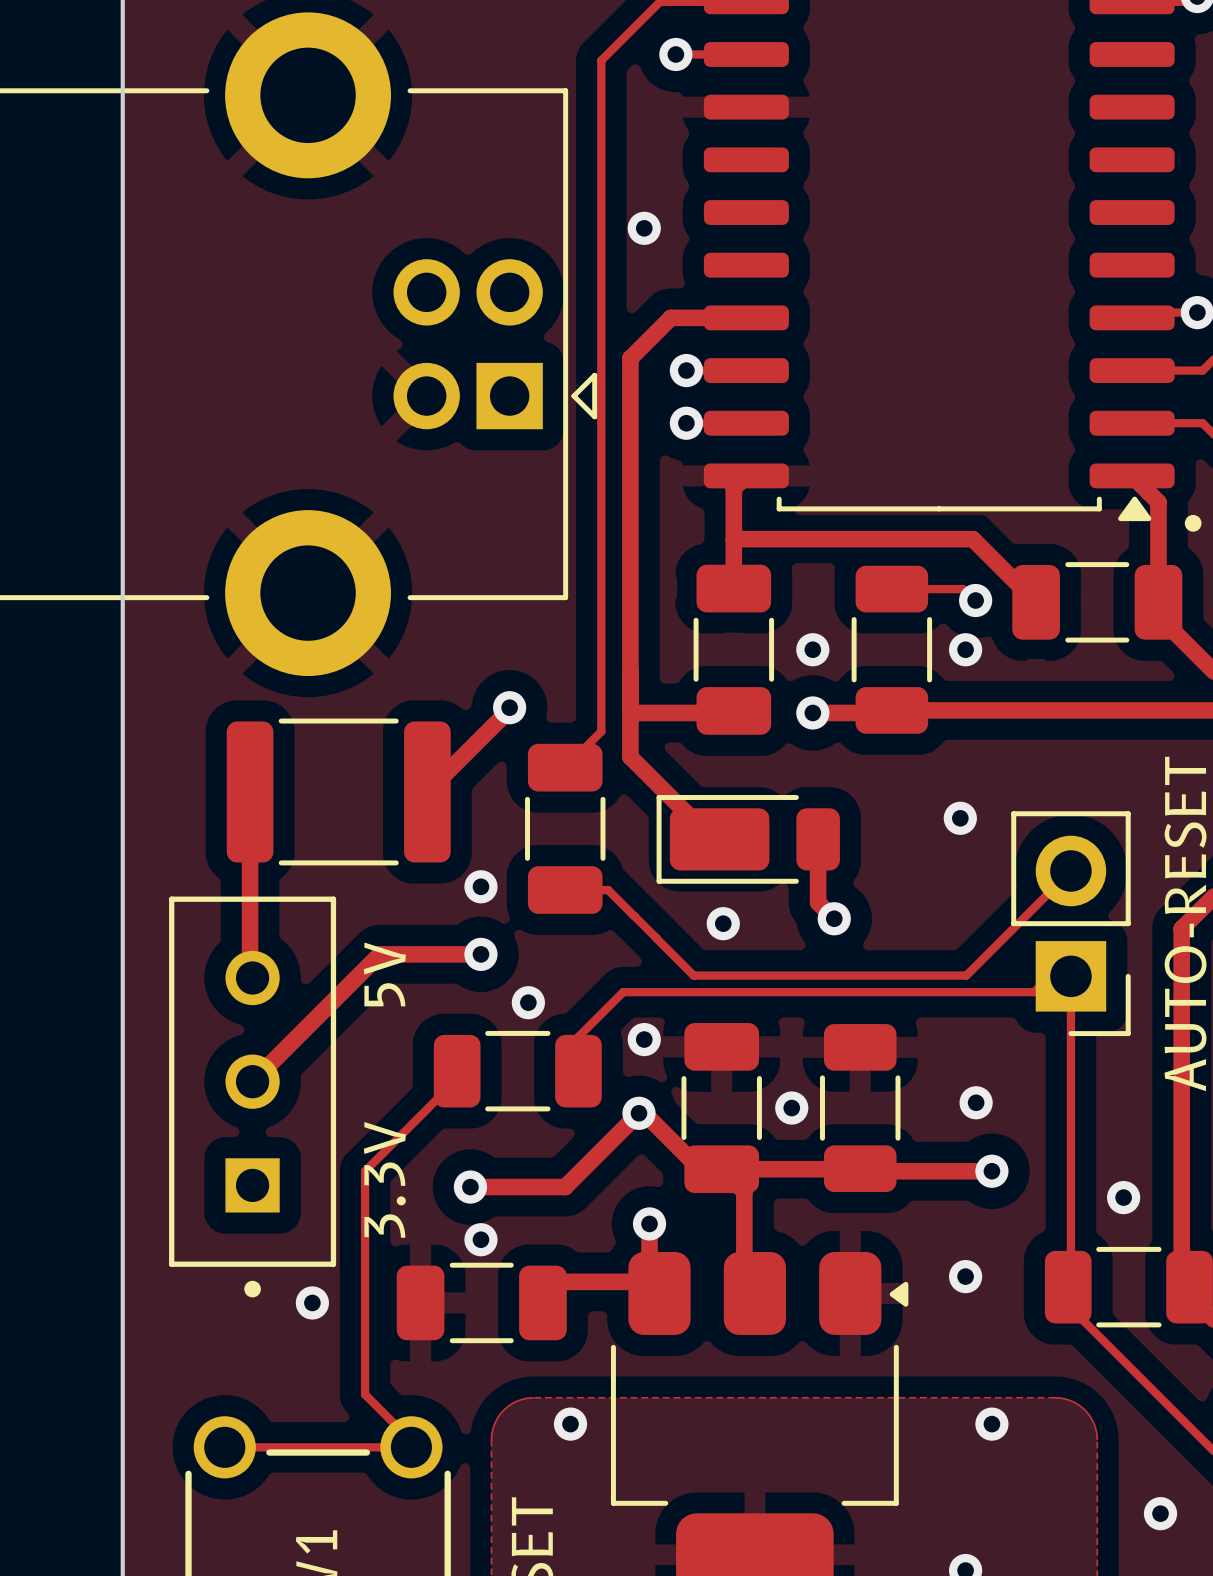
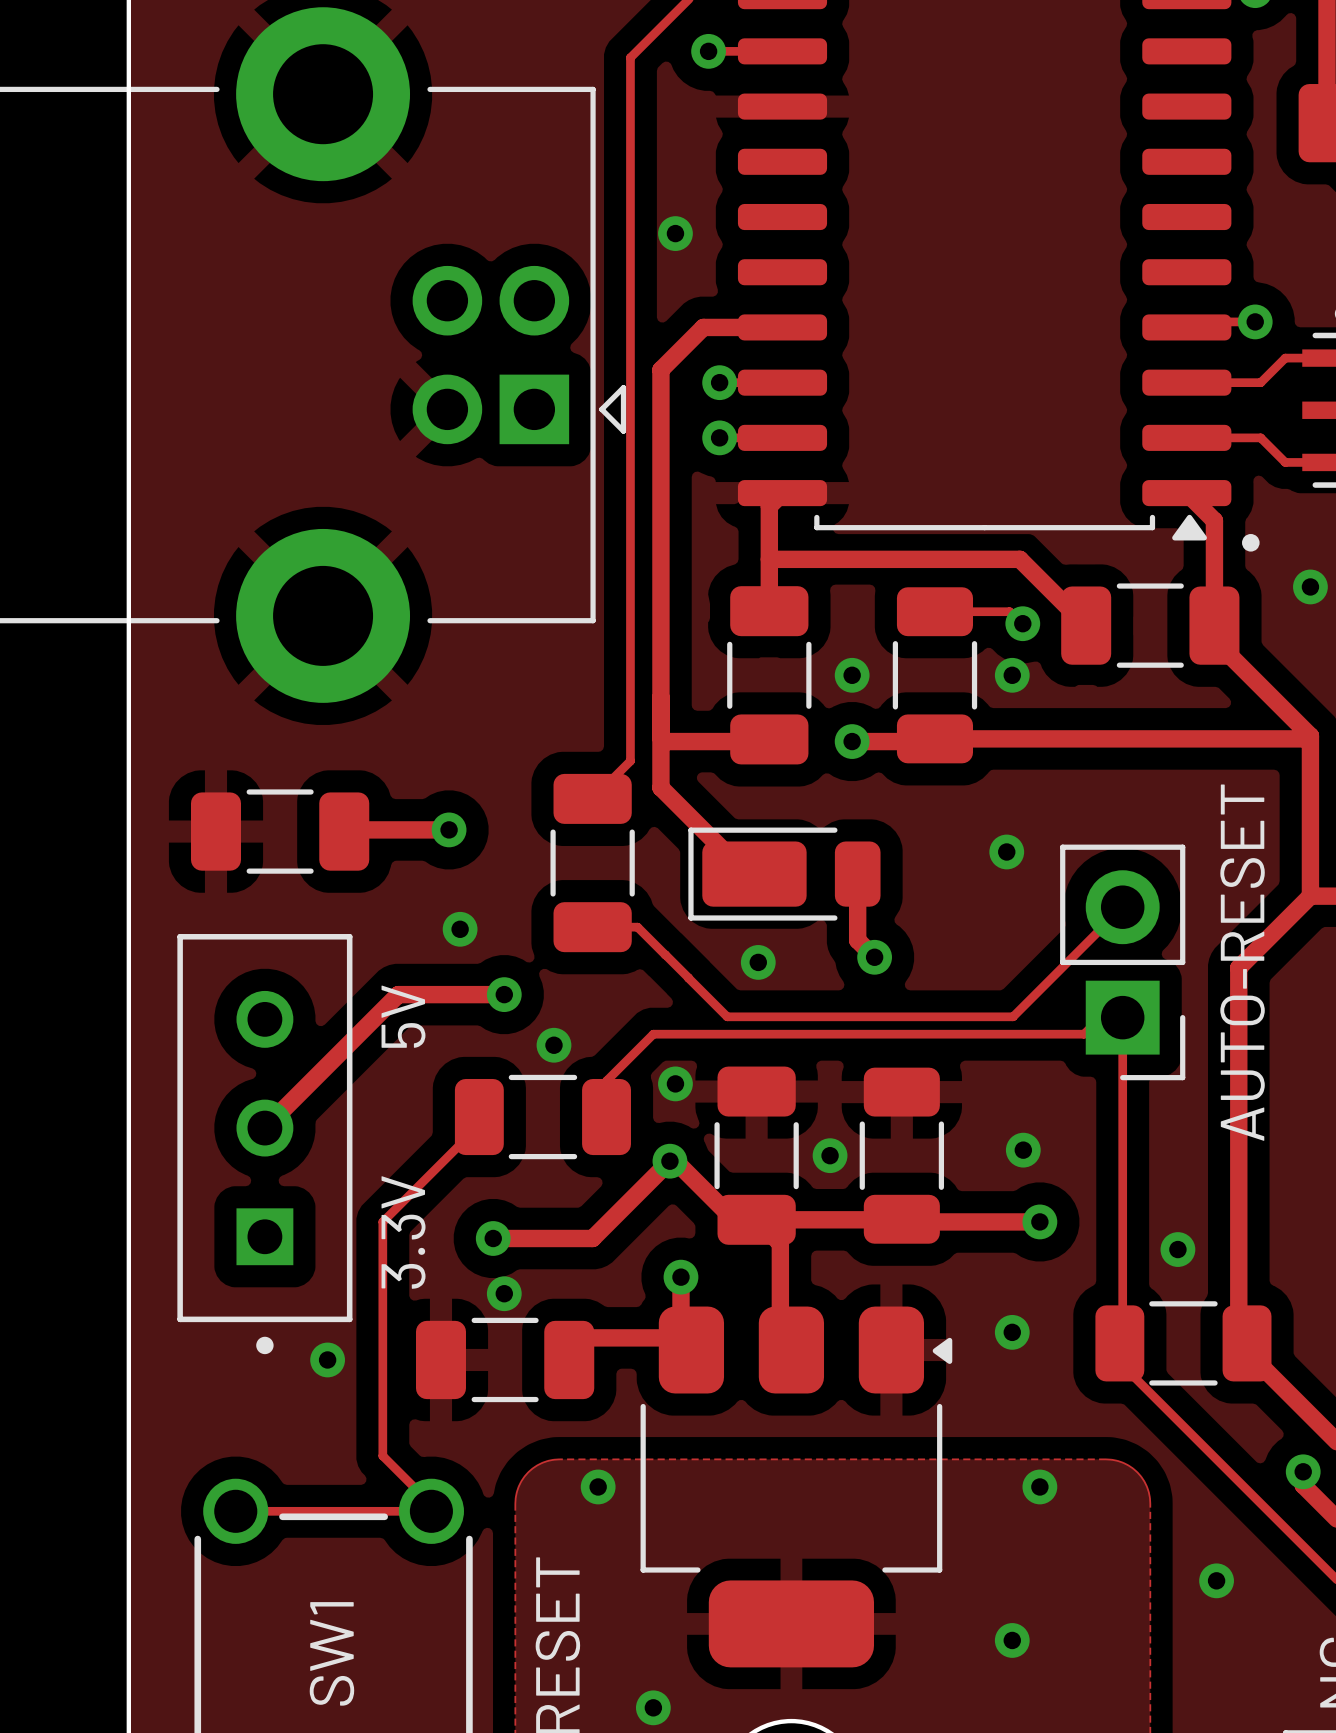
track: (509, 707) (427, 791) -> none
via: (509, 707) -> none
track: (250, 791) (250, 975) (252, 978) -> none
part: (338, 791) -> none
track: none -> (345, 829) (449, 829)
via: none -> (449, 829)
part: none -> (280, 831)
via position: (480, 886) -> (460, 929)

